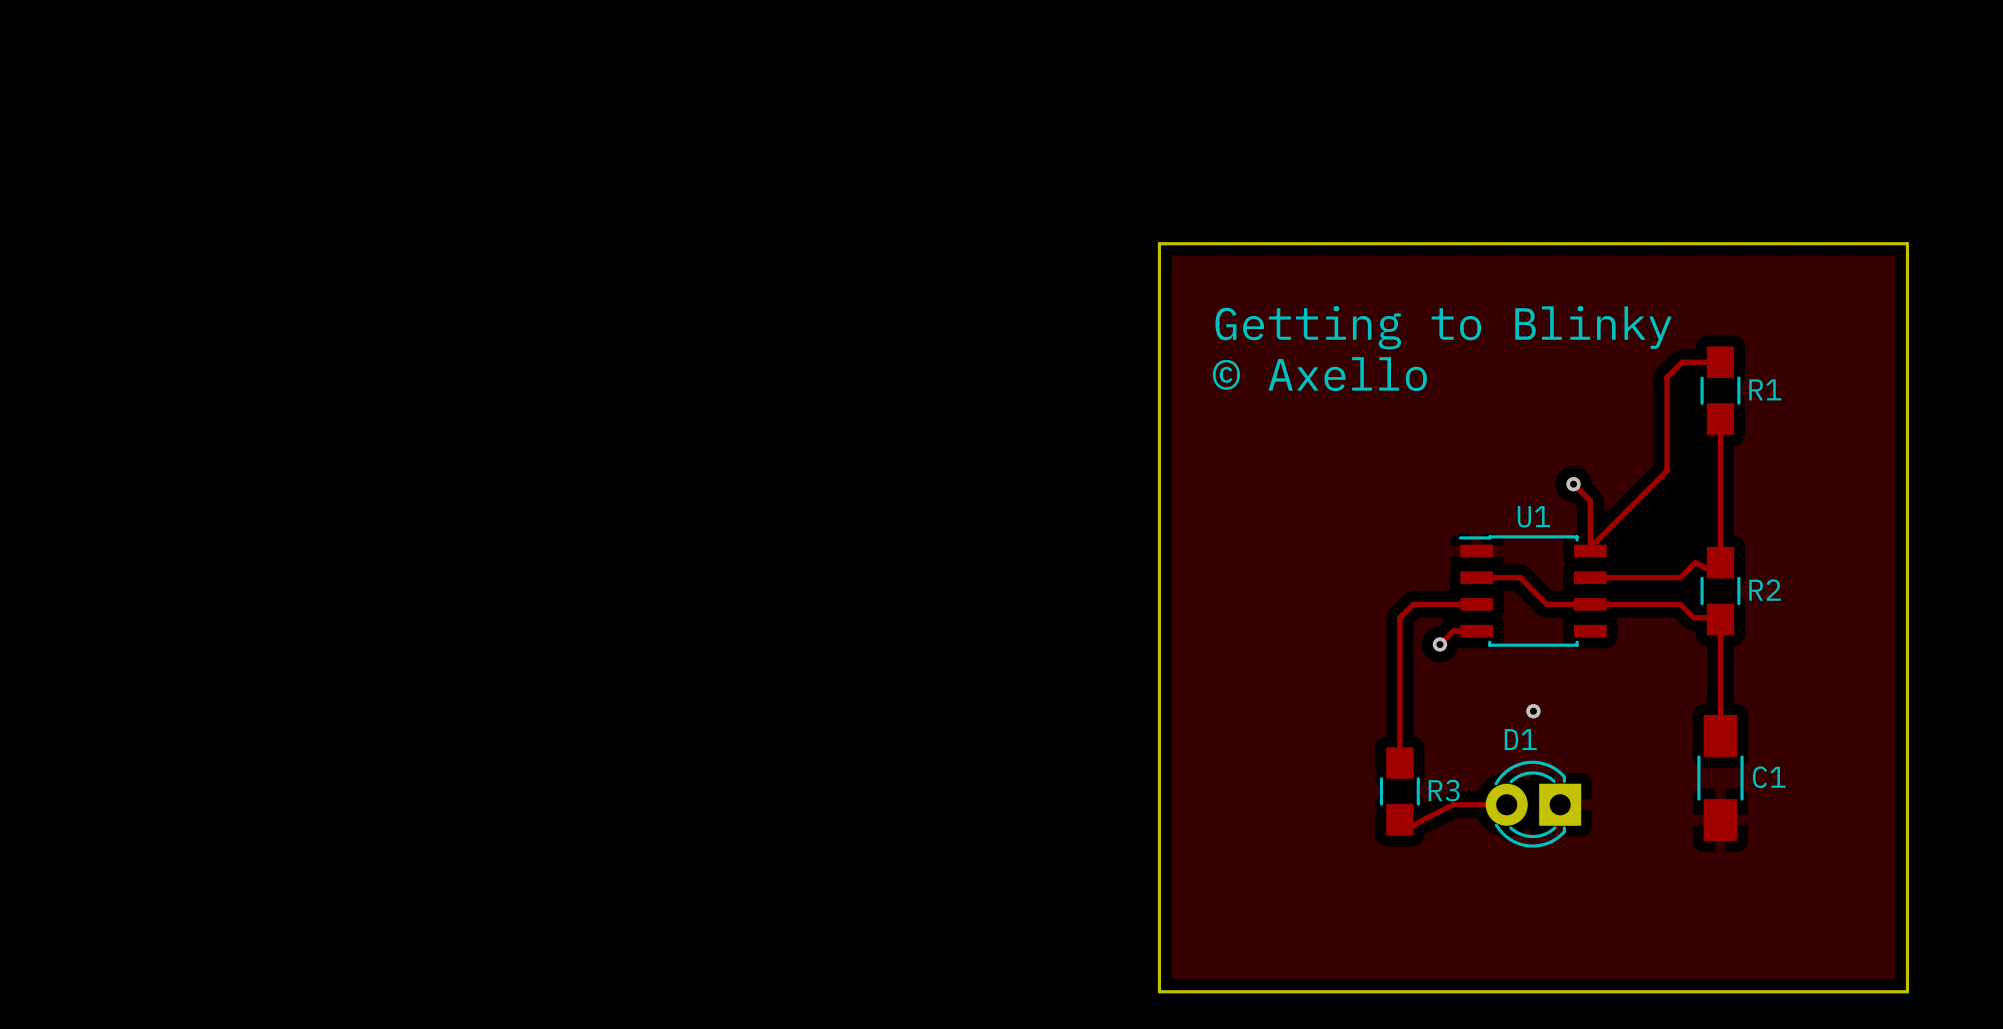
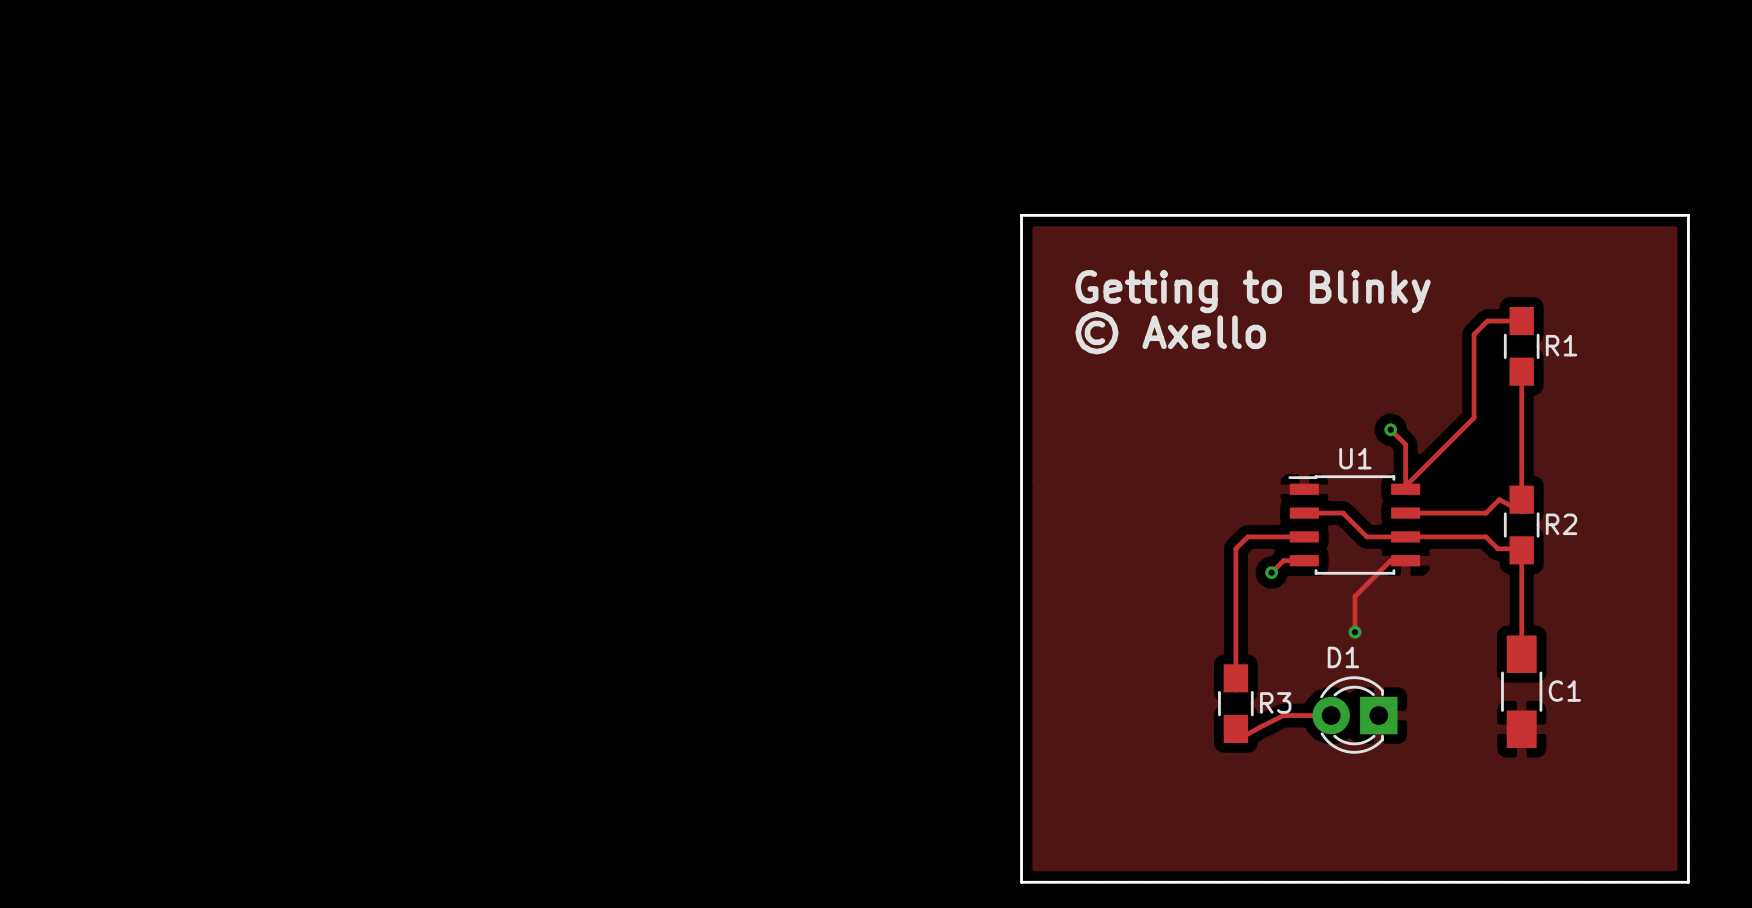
track: none -> (1405, 560) (1390, 560) (1354, 596) (1354, 632)

